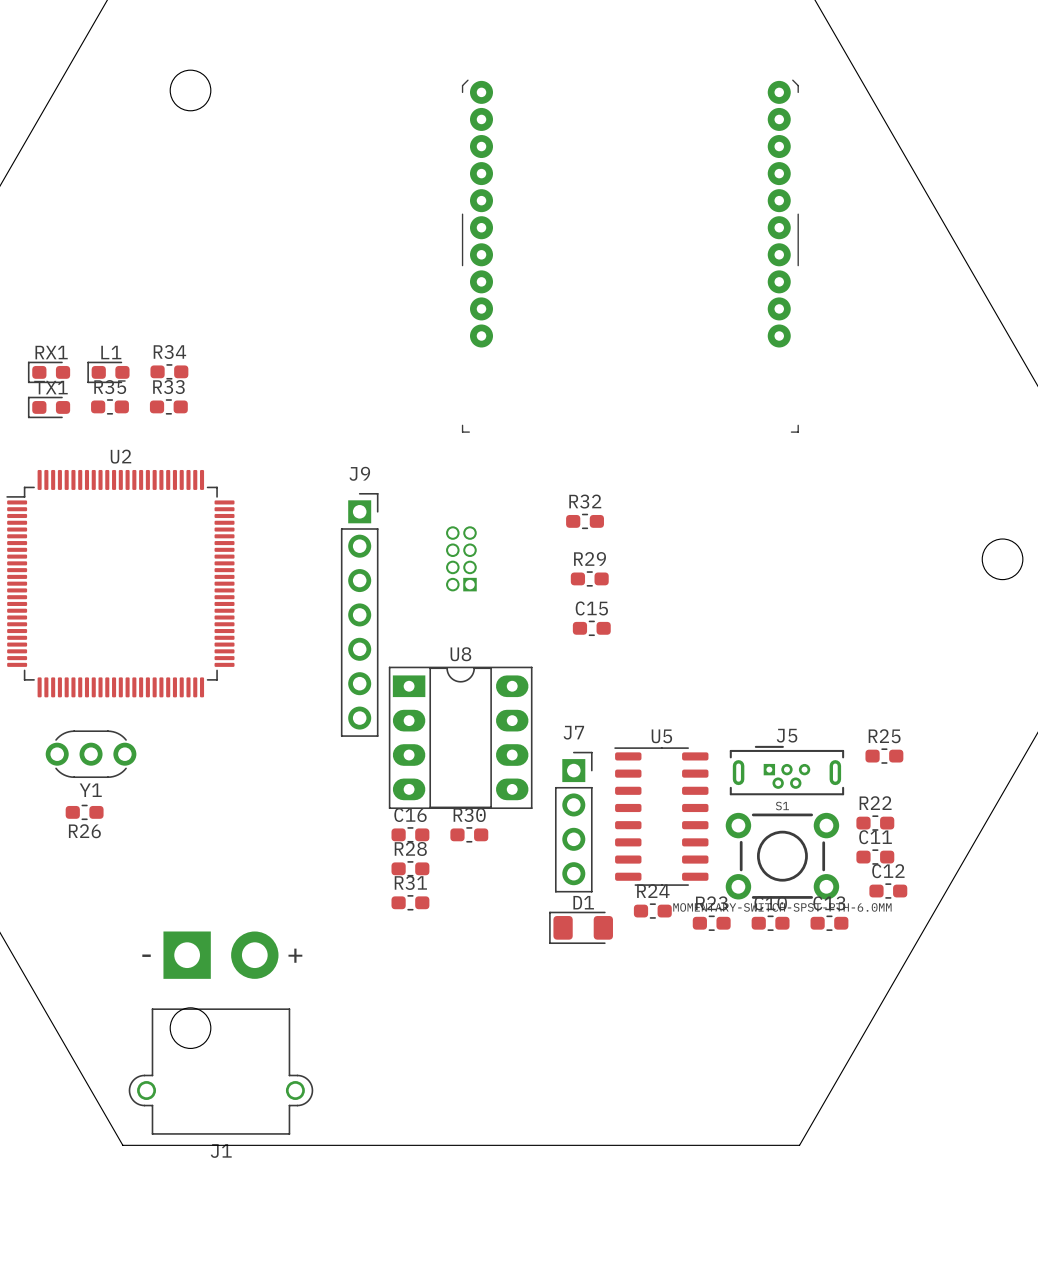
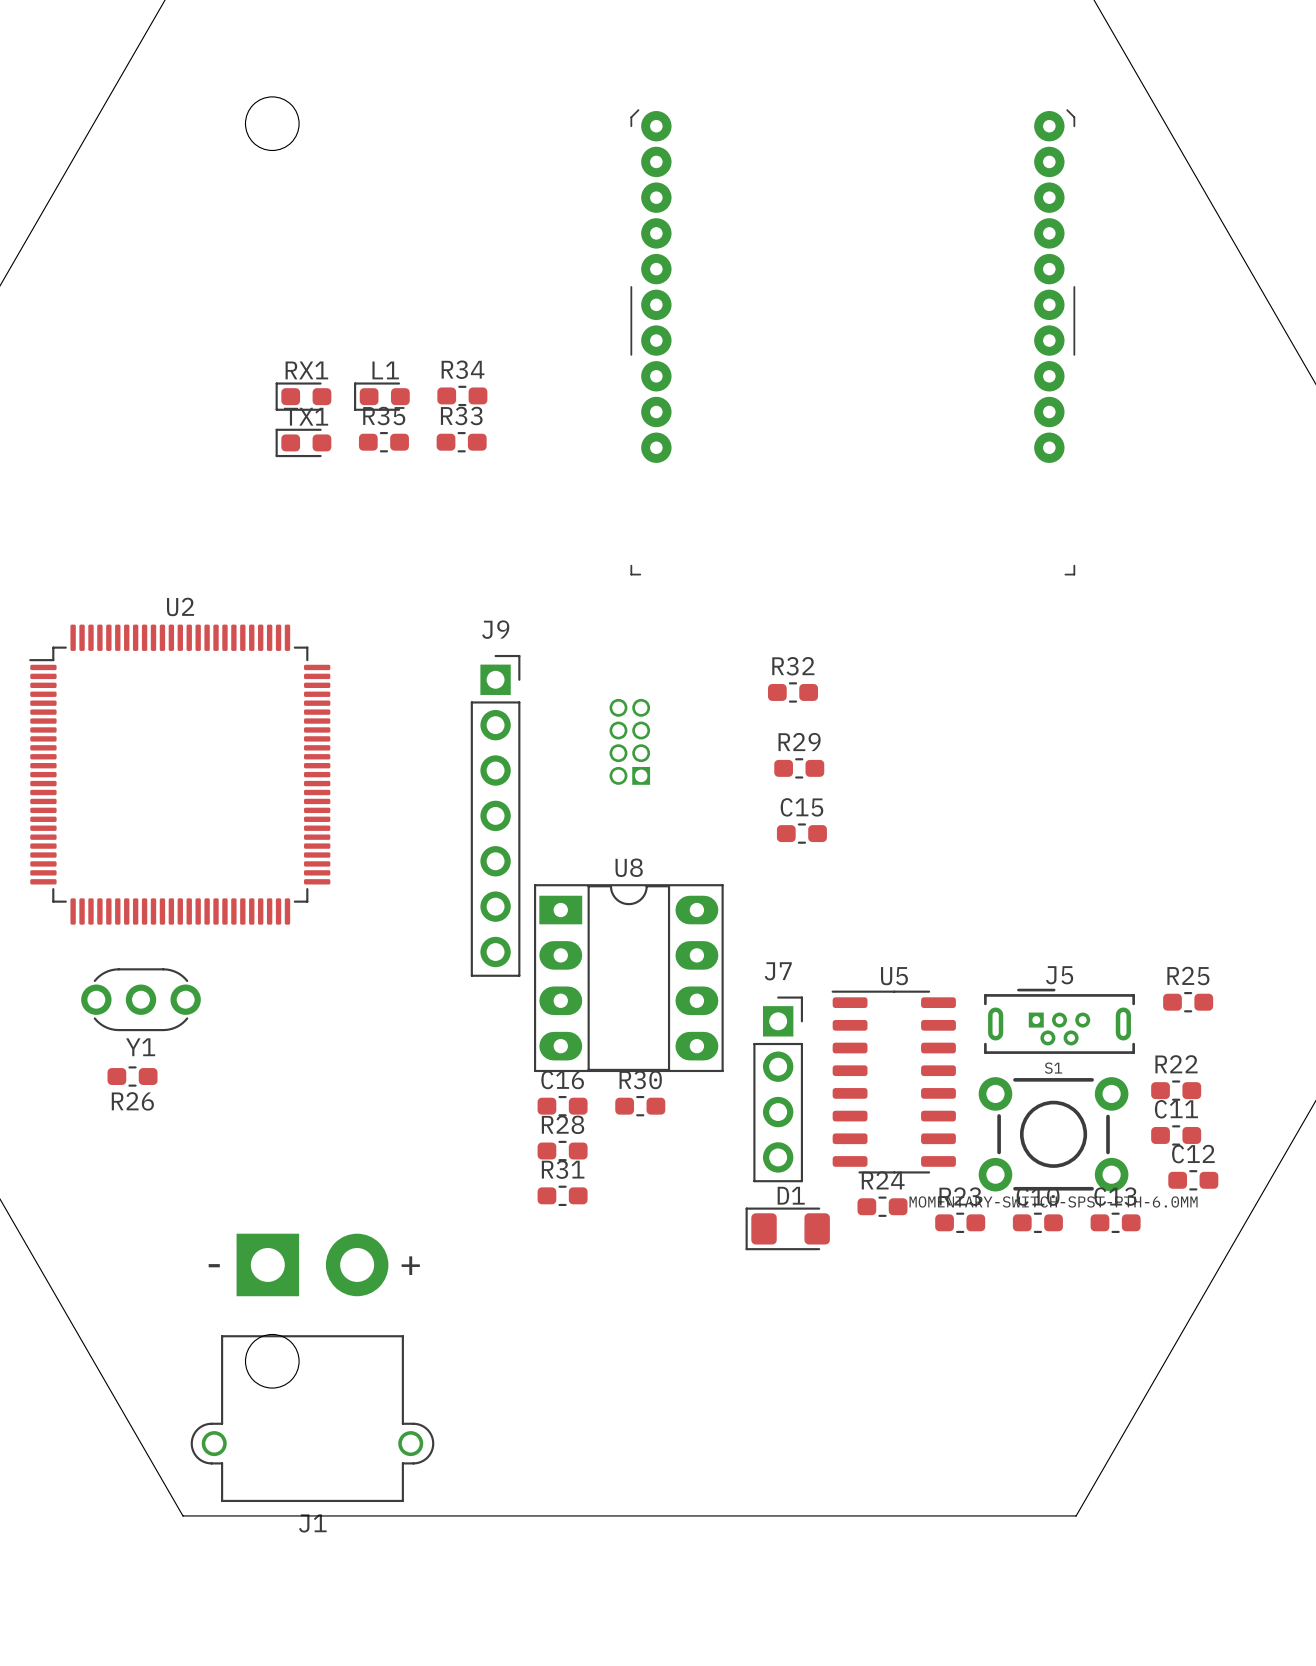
R34 position: (169, 371) -> (462, 395)
RX1 position: (49, 372) -> (303, 396)
L1 position: (108, 372) -> (381, 396)
R35 position: (109, 406) -> (383, 442)
R33 position: (168, 406) -> (461, 442)
TX1 position: (49, 407) -> (303, 442)

